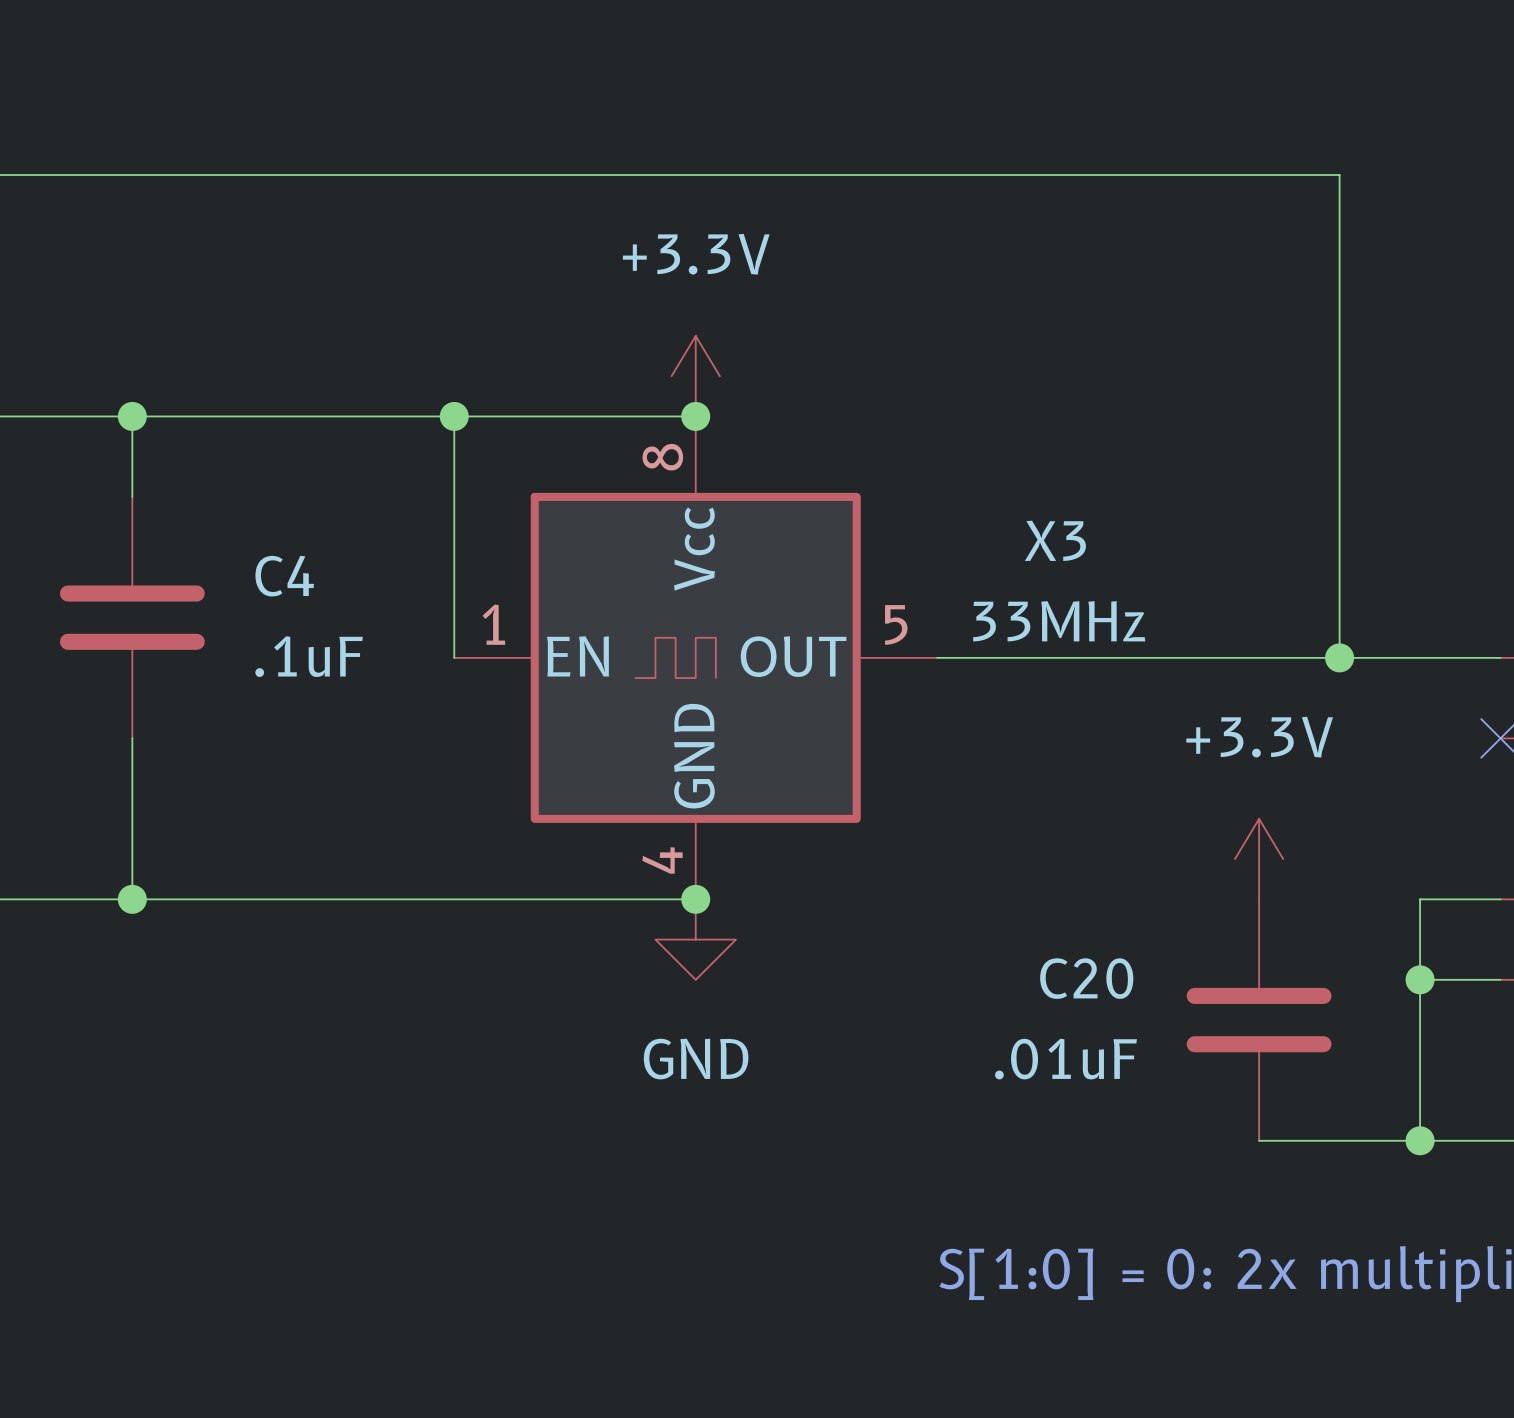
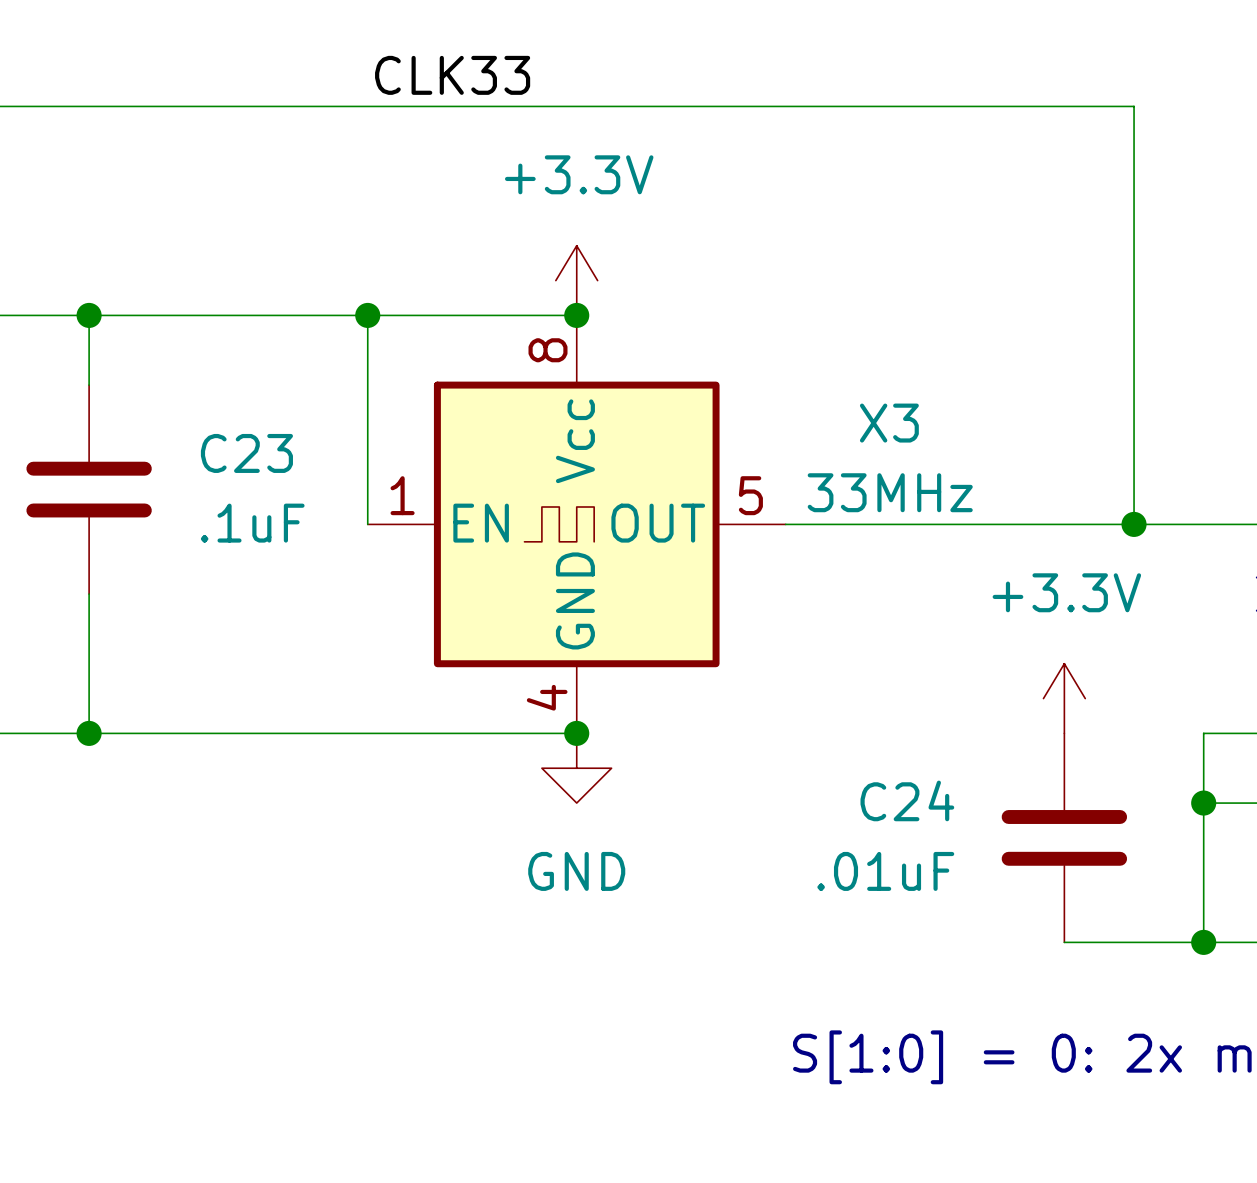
label: none -> CLK33 (452, 75)
C4 name: C4 (284, 576) -> C23 (246, 453)
C20 name: C20 (1086, 978) -> C24 (907, 800)

